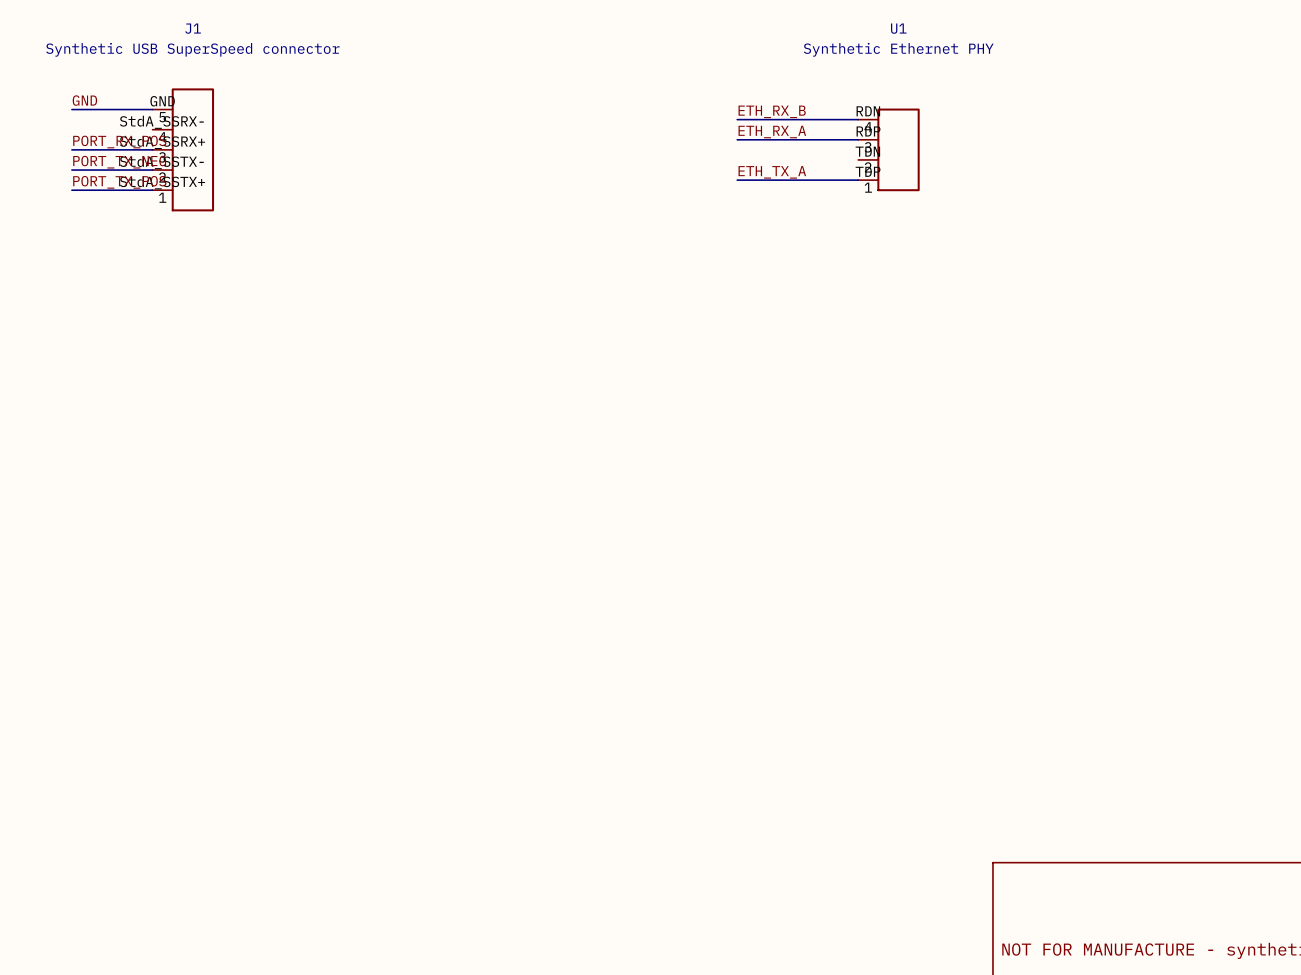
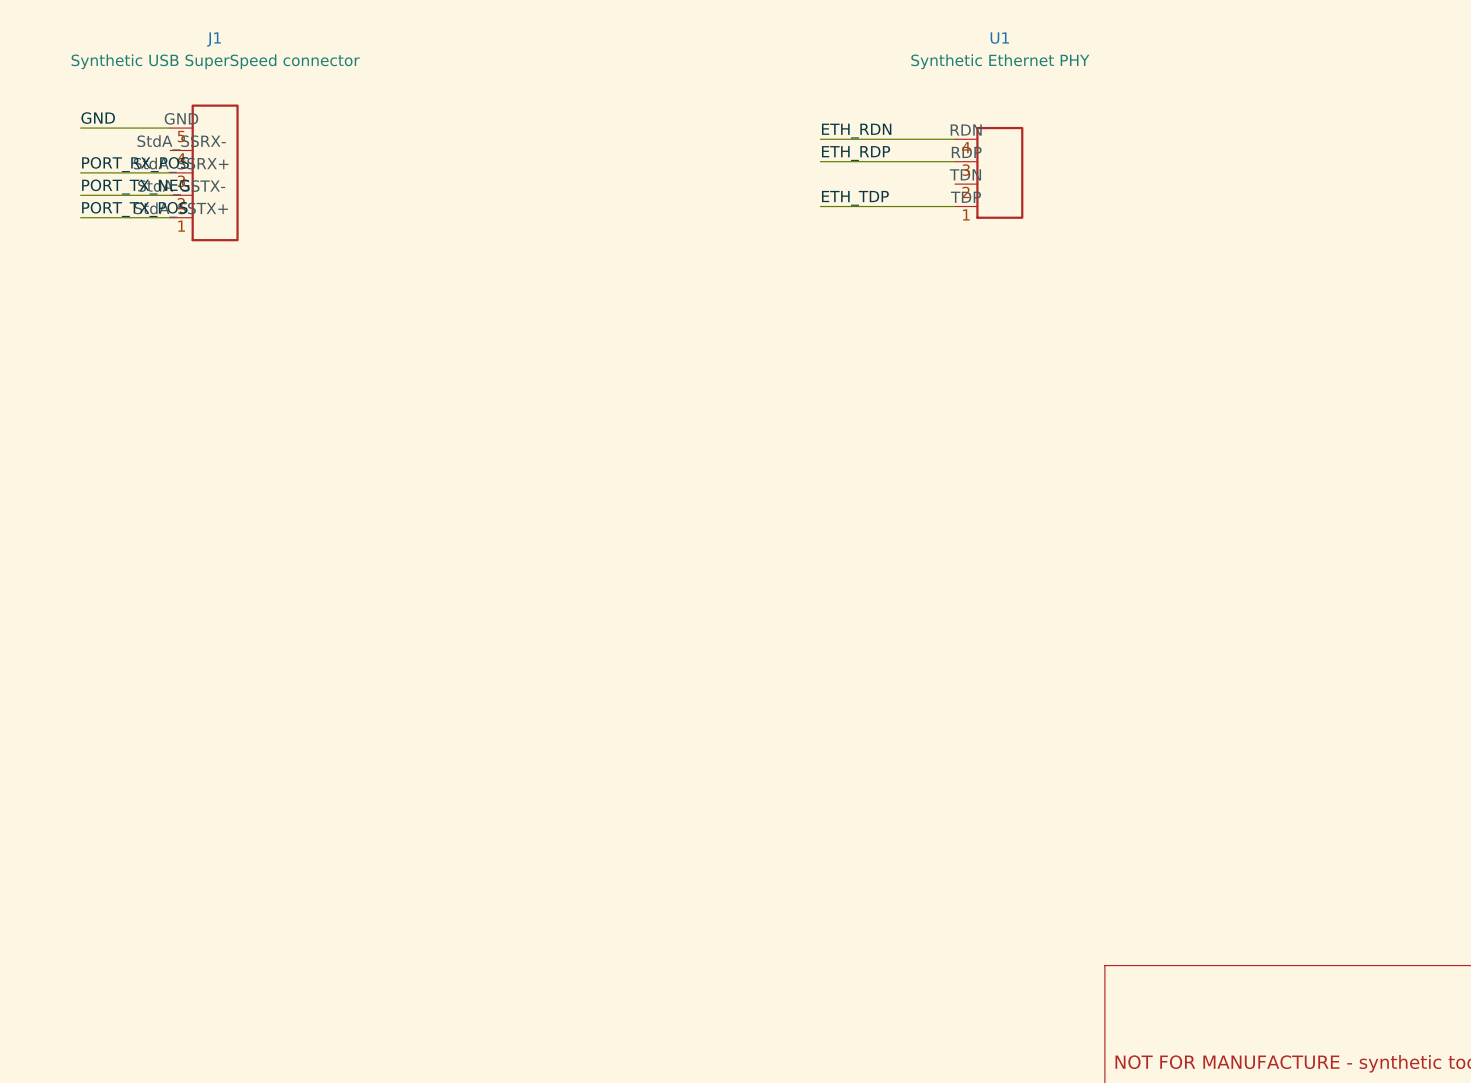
label: ETH_RX_B (772, 111) -> ETH_RDN (856, 131)
label: ETH_RX_A (772, 132) -> ETH_RDP (856, 153)
label: ETH_TX_A (772, 172) -> ETH_TDP (855, 198)

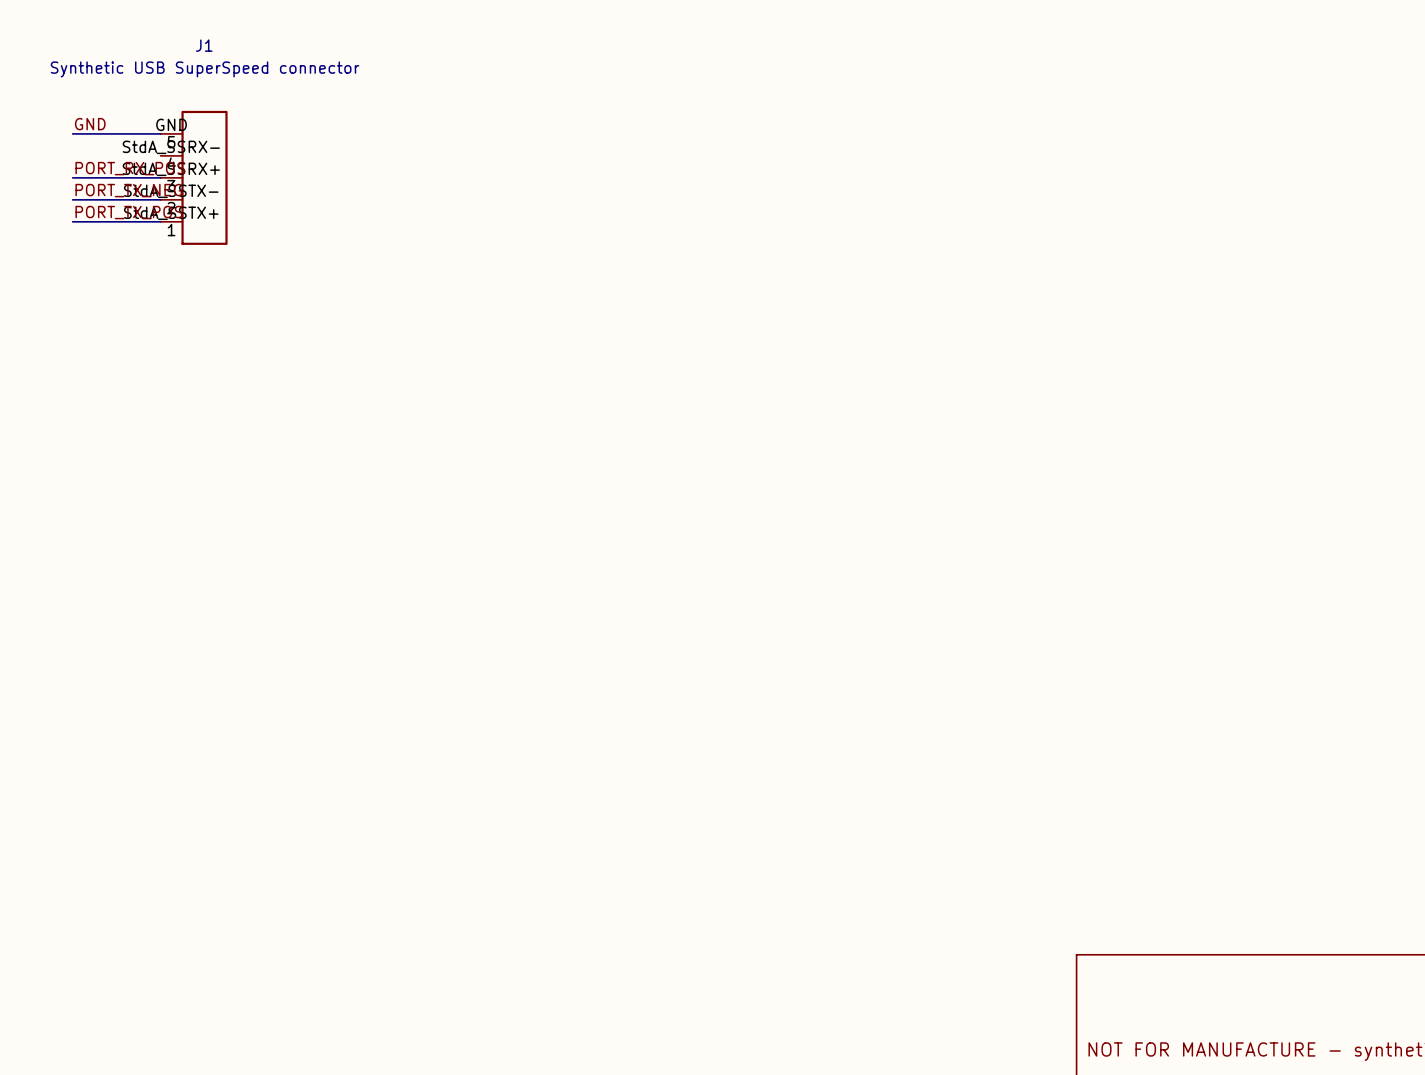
label: ETH_RDN (856, 131) -> none
wire: (820, 139) (955, 139) -> none
label: ETH_RDP (856, 153) -> none
wire: (820, 161) (955, 161) -> none
U1: Synthetic Ethernet PHY (989, 172) -> none
label: ETH_TDP (855, 198) -> none
wire: (820, 206) (955, 206) -> none

